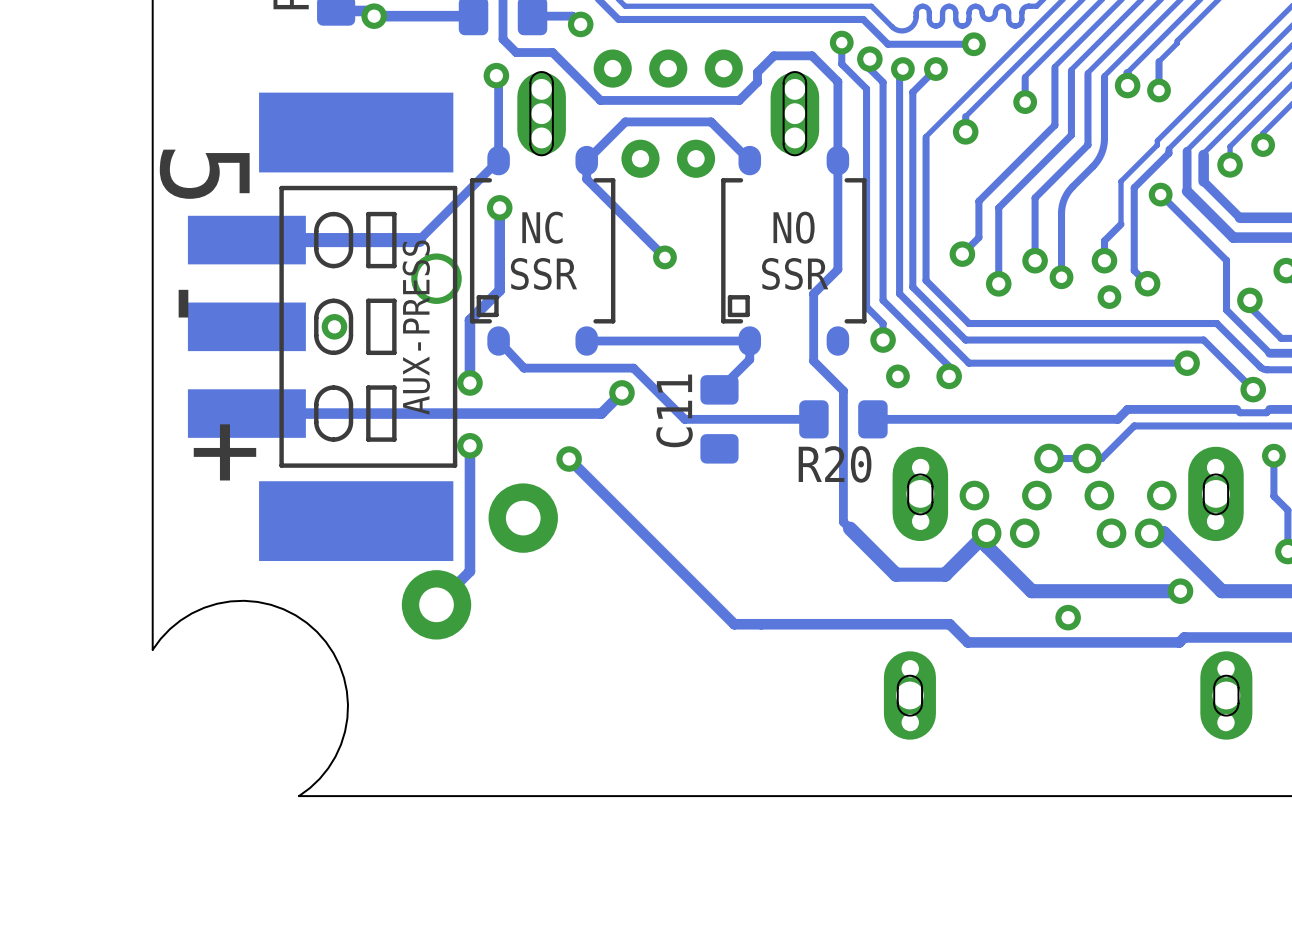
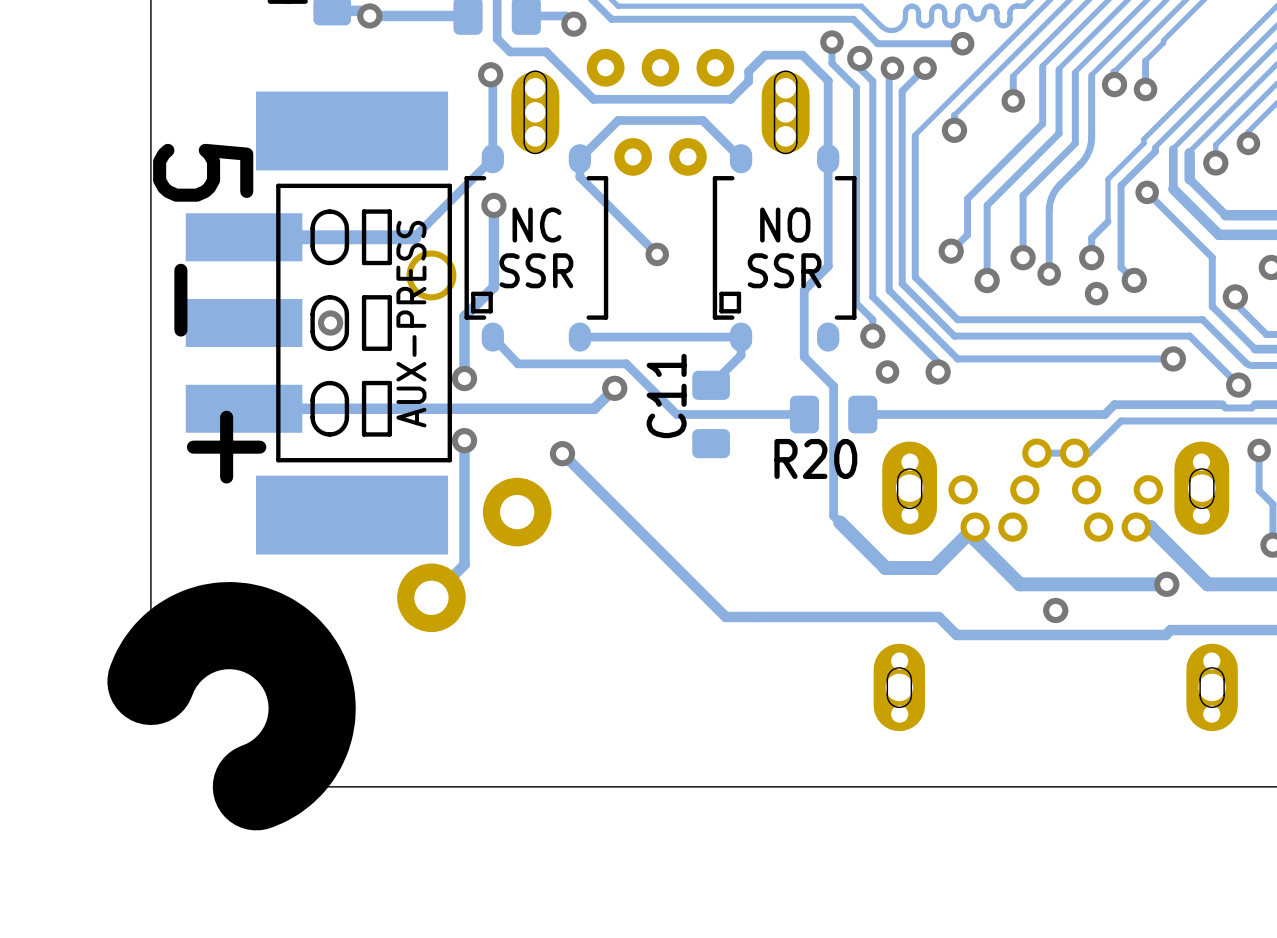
board edge: (152, 649) (170, 629) (191, 613) (204, 607) (230, 601) (244, 600) (270, 604) (295, 615) (316, 631) (333, 653) (344, 678) (348, 704) (347, 718) (341, 744) (335, 756) (319, 778) (299, 796) -> (150, 642) (150, 681) (160, 662) (173, 646) (191, 634) (210, 627) (231, 625) (252, 628) (271, 637) (287, 649) (300, 666) (309, 685) (312, 706) (310, 727) (302, 746) (290, 763) (275, 777) (256, 786) (295, 786)

